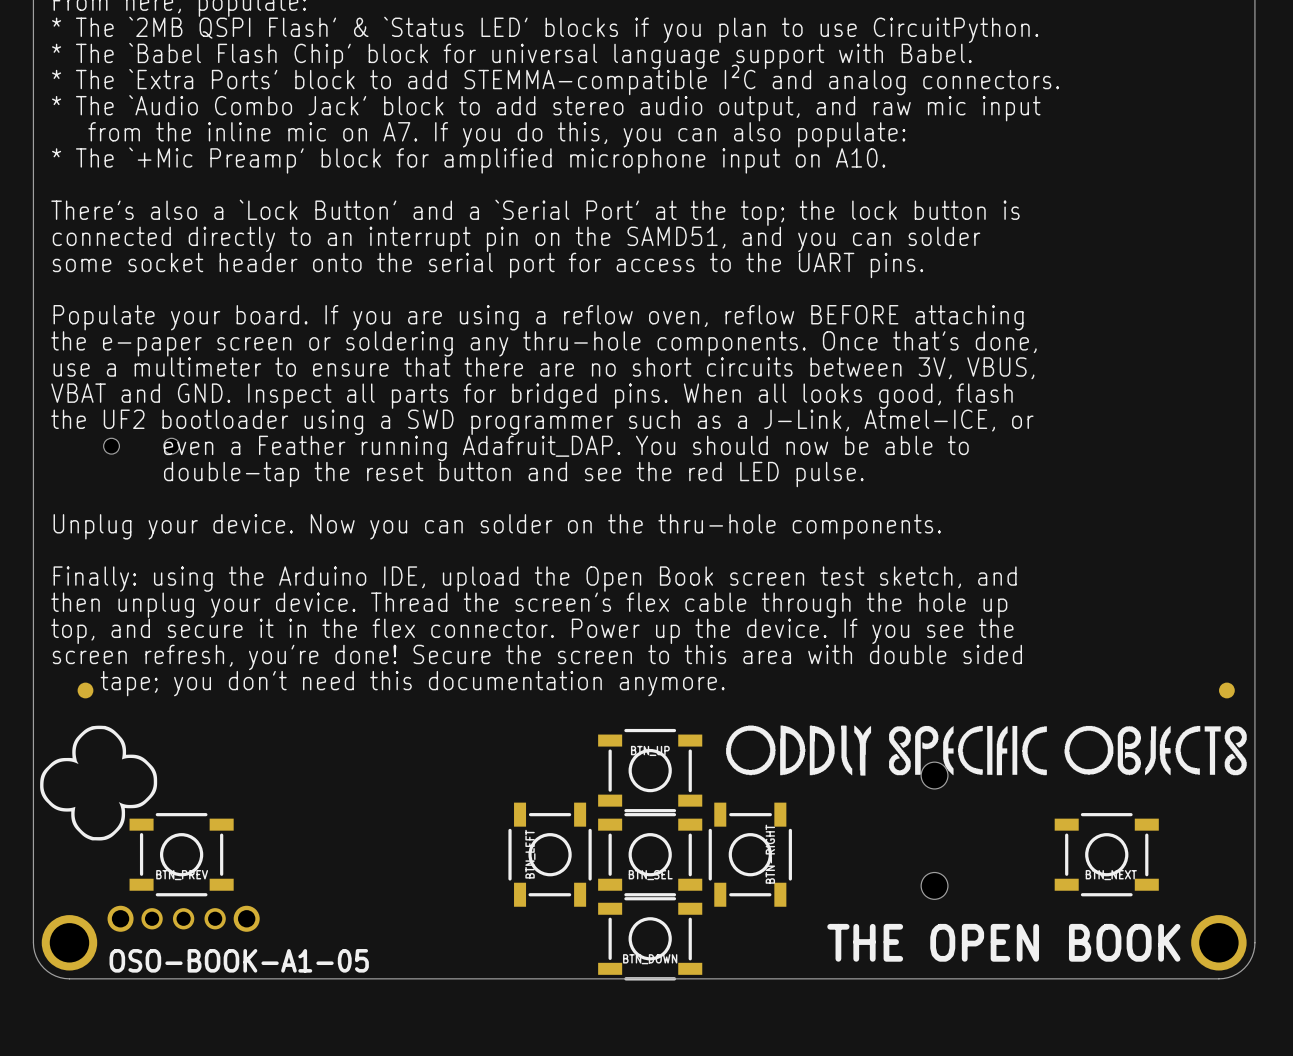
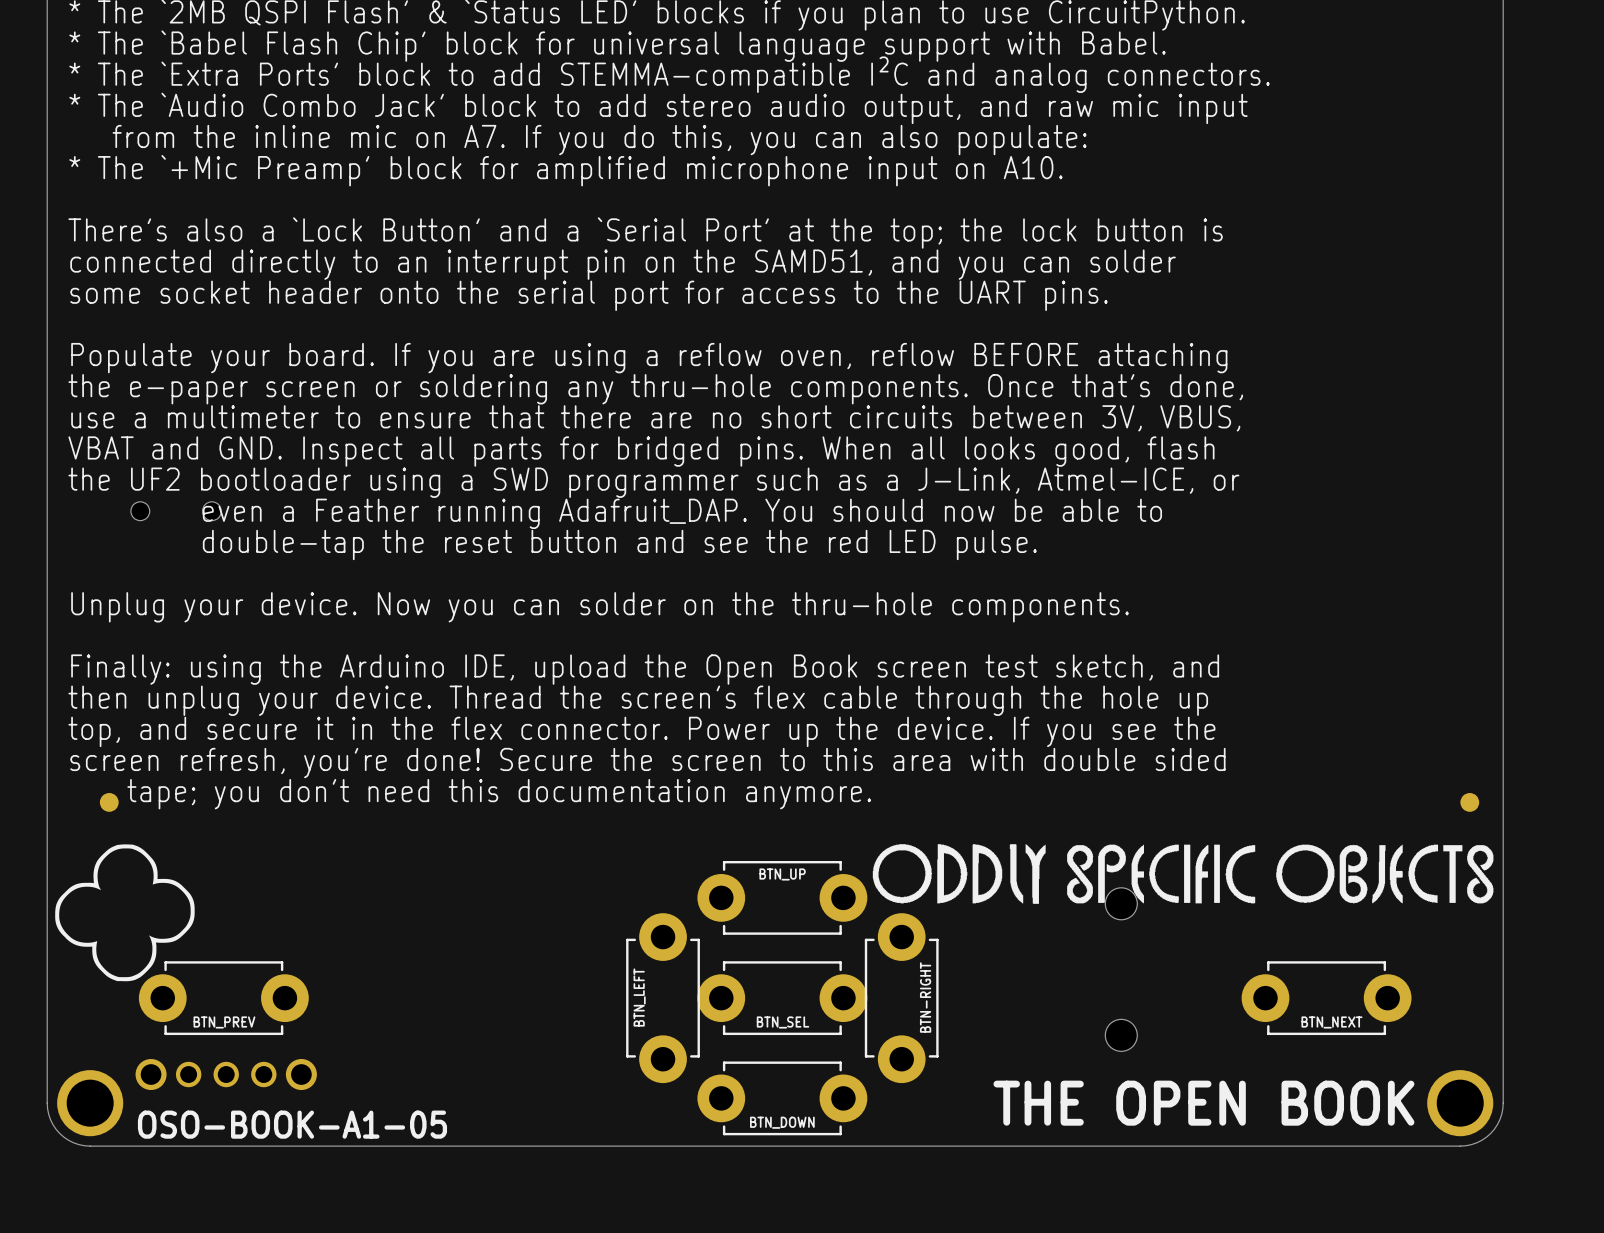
BTN_UP footprint: [598, 728, 703, 813] -> [697, 860, 868, 935]
BTN_LEFT footprint: [508, 802, 592, 907] -> [626, 913, 700, 1084]
BTN-RIGHT footprint: [708, 802, 792, 907] -> [864, 913, 939, 1084]
BTN_PREV footprint: [129, 813, 234, 897] -> [138, 961, 309, 1036]
BTN_SEL footprint: [598, 813, 703, 897] -> [697, 961, 868, 1036]
BTN_NEXT footprint: [1054, 813, 1159, 897] -> [1241, 961, 1412, 1036]
BTN_DOWN footprint: [598, 897, 703, 981] -> [697, 1061, 868, 1136]

